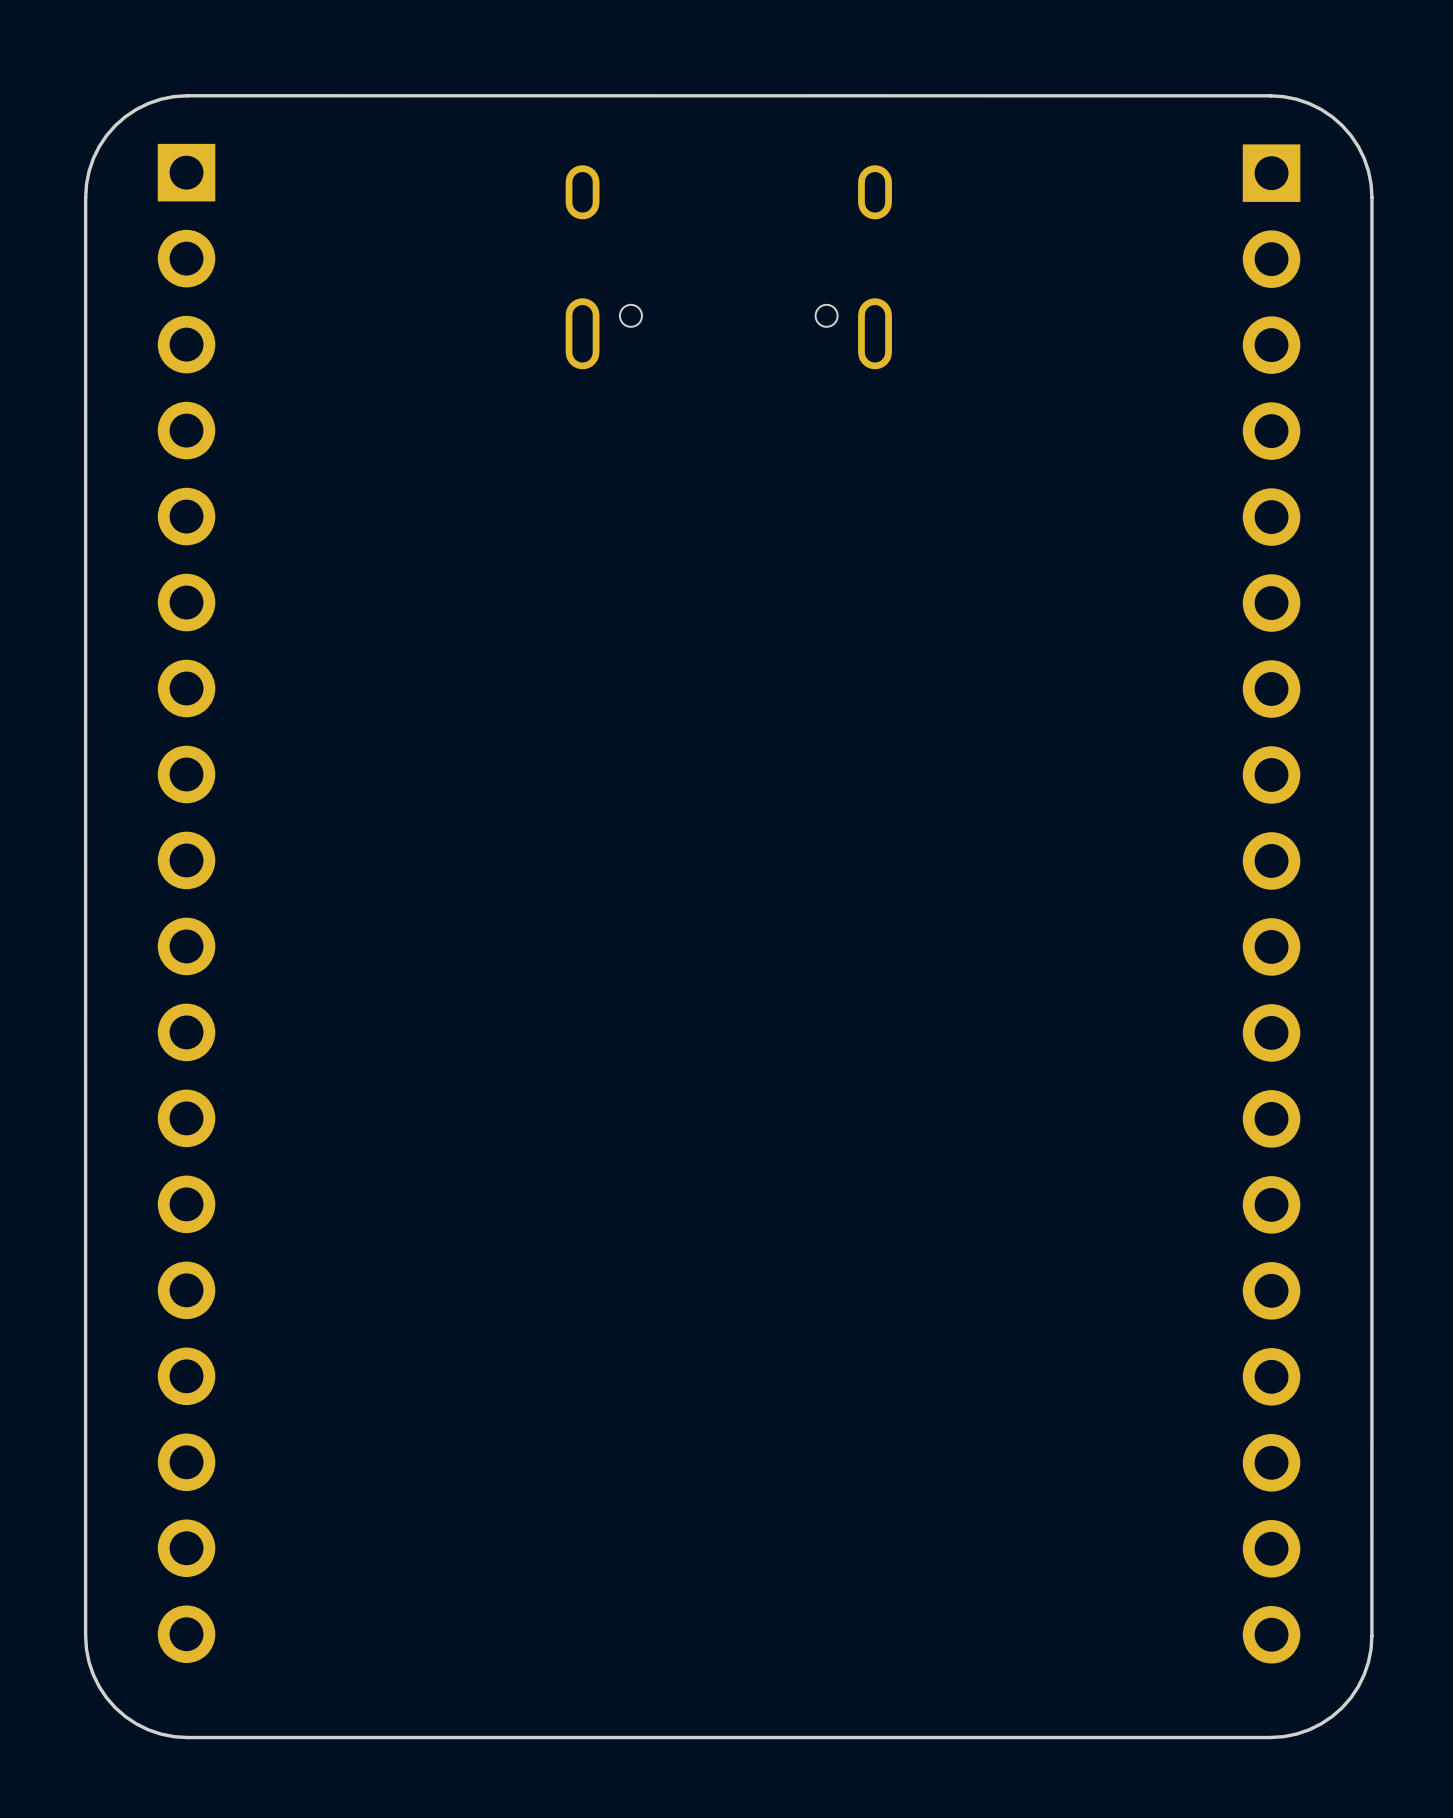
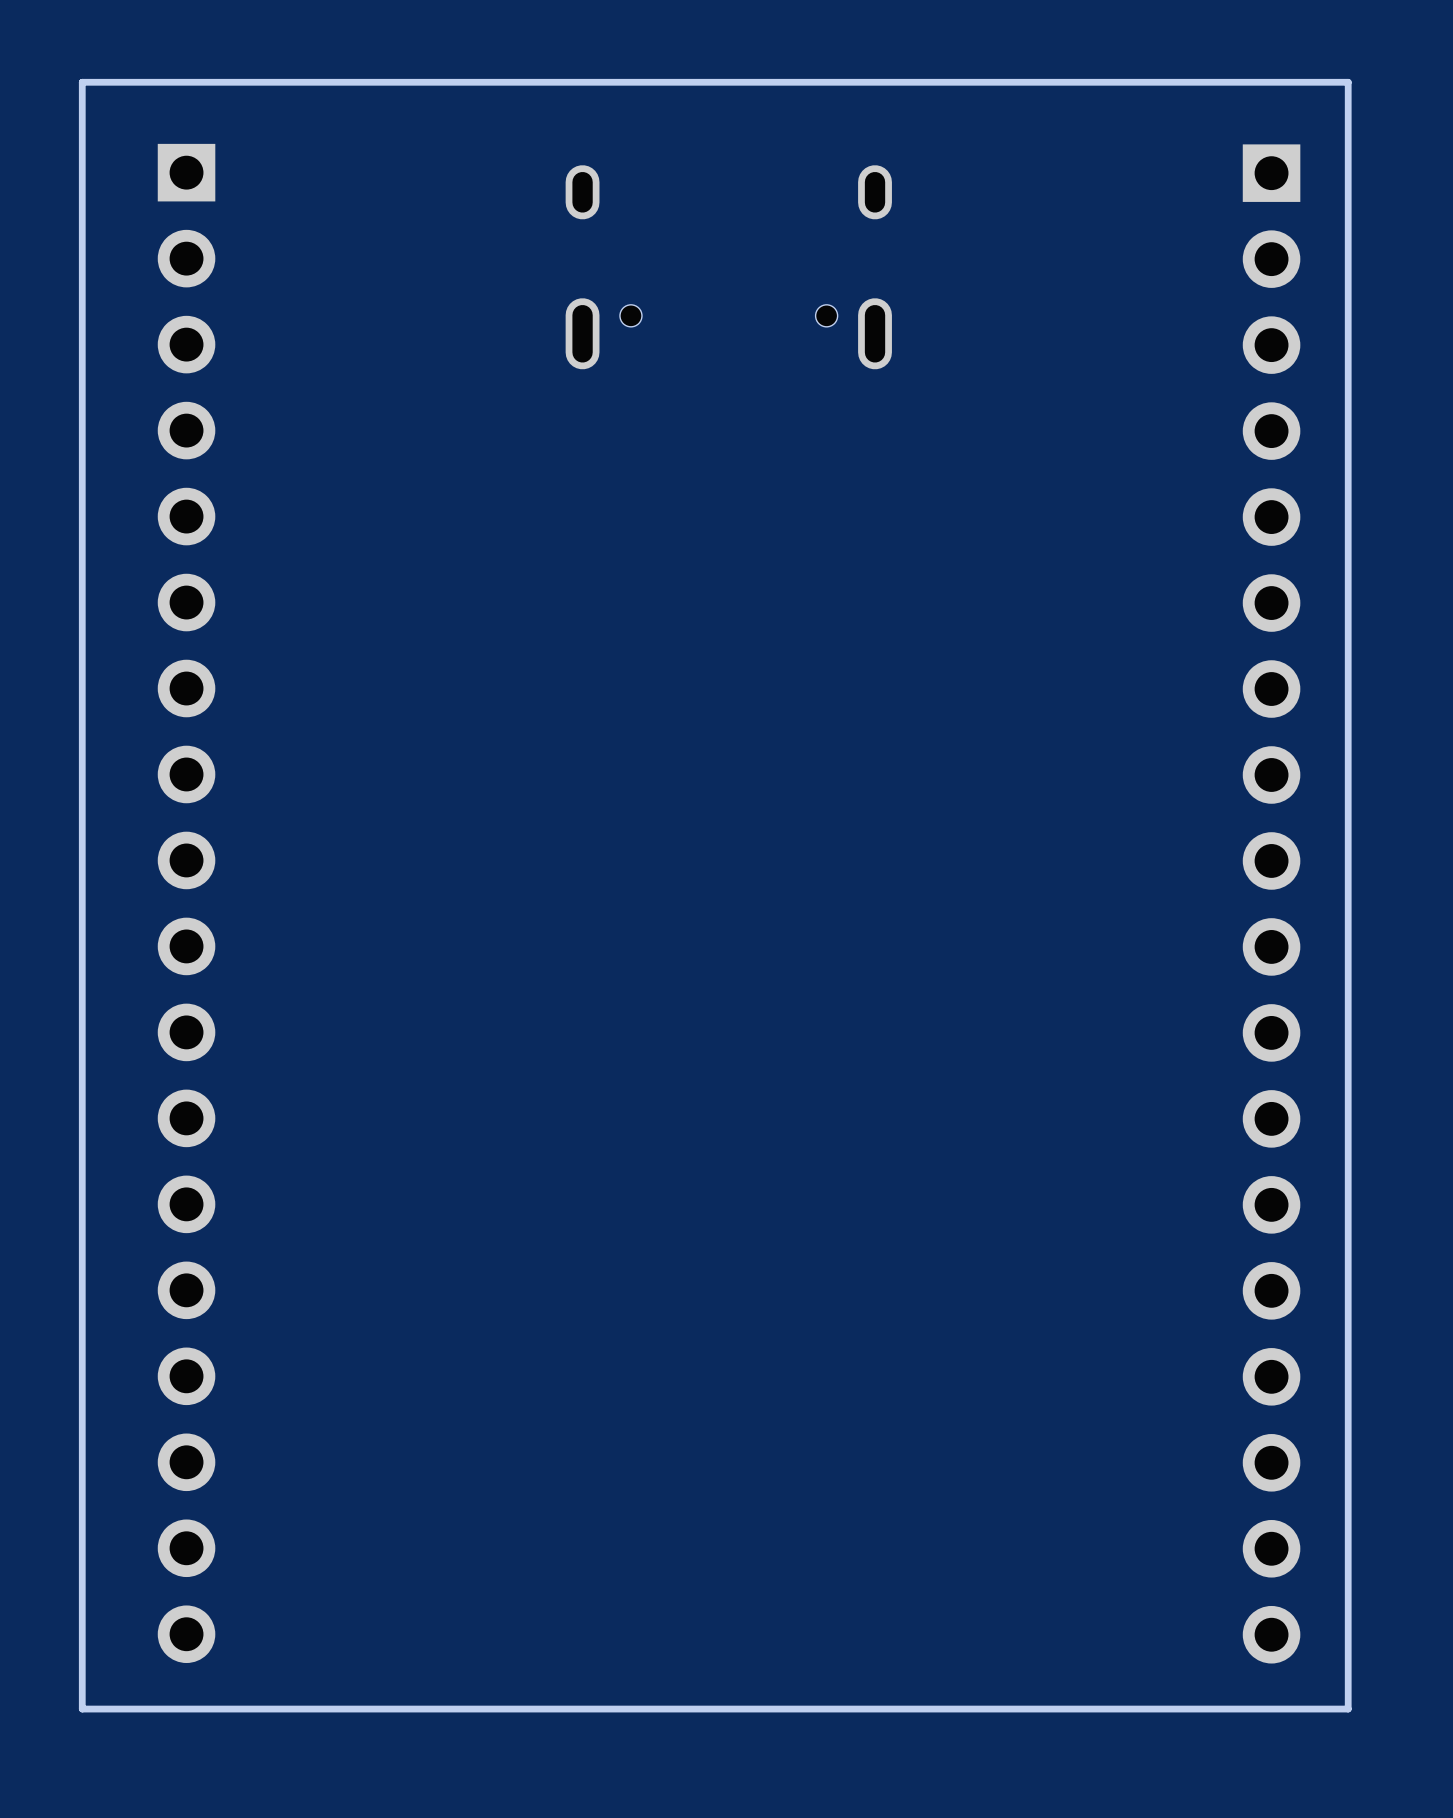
board edge: (1270, 95) (187, 95) (160, 99) (136, 109) (125, 116) (106, 135) (93, 158) (89, 171) (85, 197) (85, 1635) (89, 1662) (93, 1674) (106, 1697) (125, 1716) (148, 1729) (160, 1734) (187, 1737) (1270, 1737) (1296, 1734) (1309, 1729) (1332, 1716) (1350, 1697) (1364, 1674) (1368, 1662) (1371, 1635) (1371, 197) (1368, 171) (1364, 158) (1358, 146) (1342, 125) (1321, 109) (1309, 103) (1296, 99) (1270, 95) -> (1348, 82) (1348, 1709) (82, 1709) (82, 82) (1348, 82)

